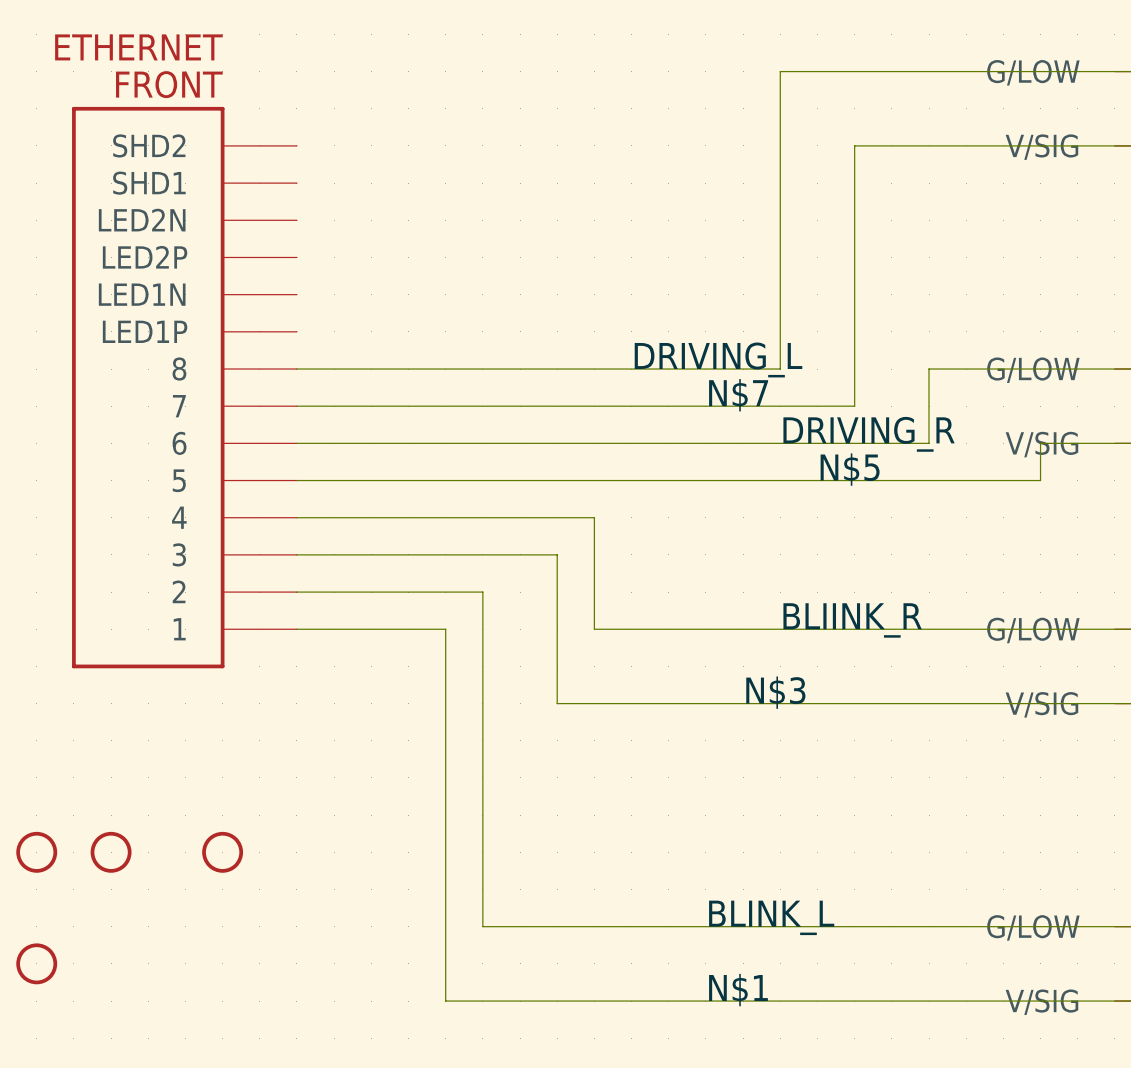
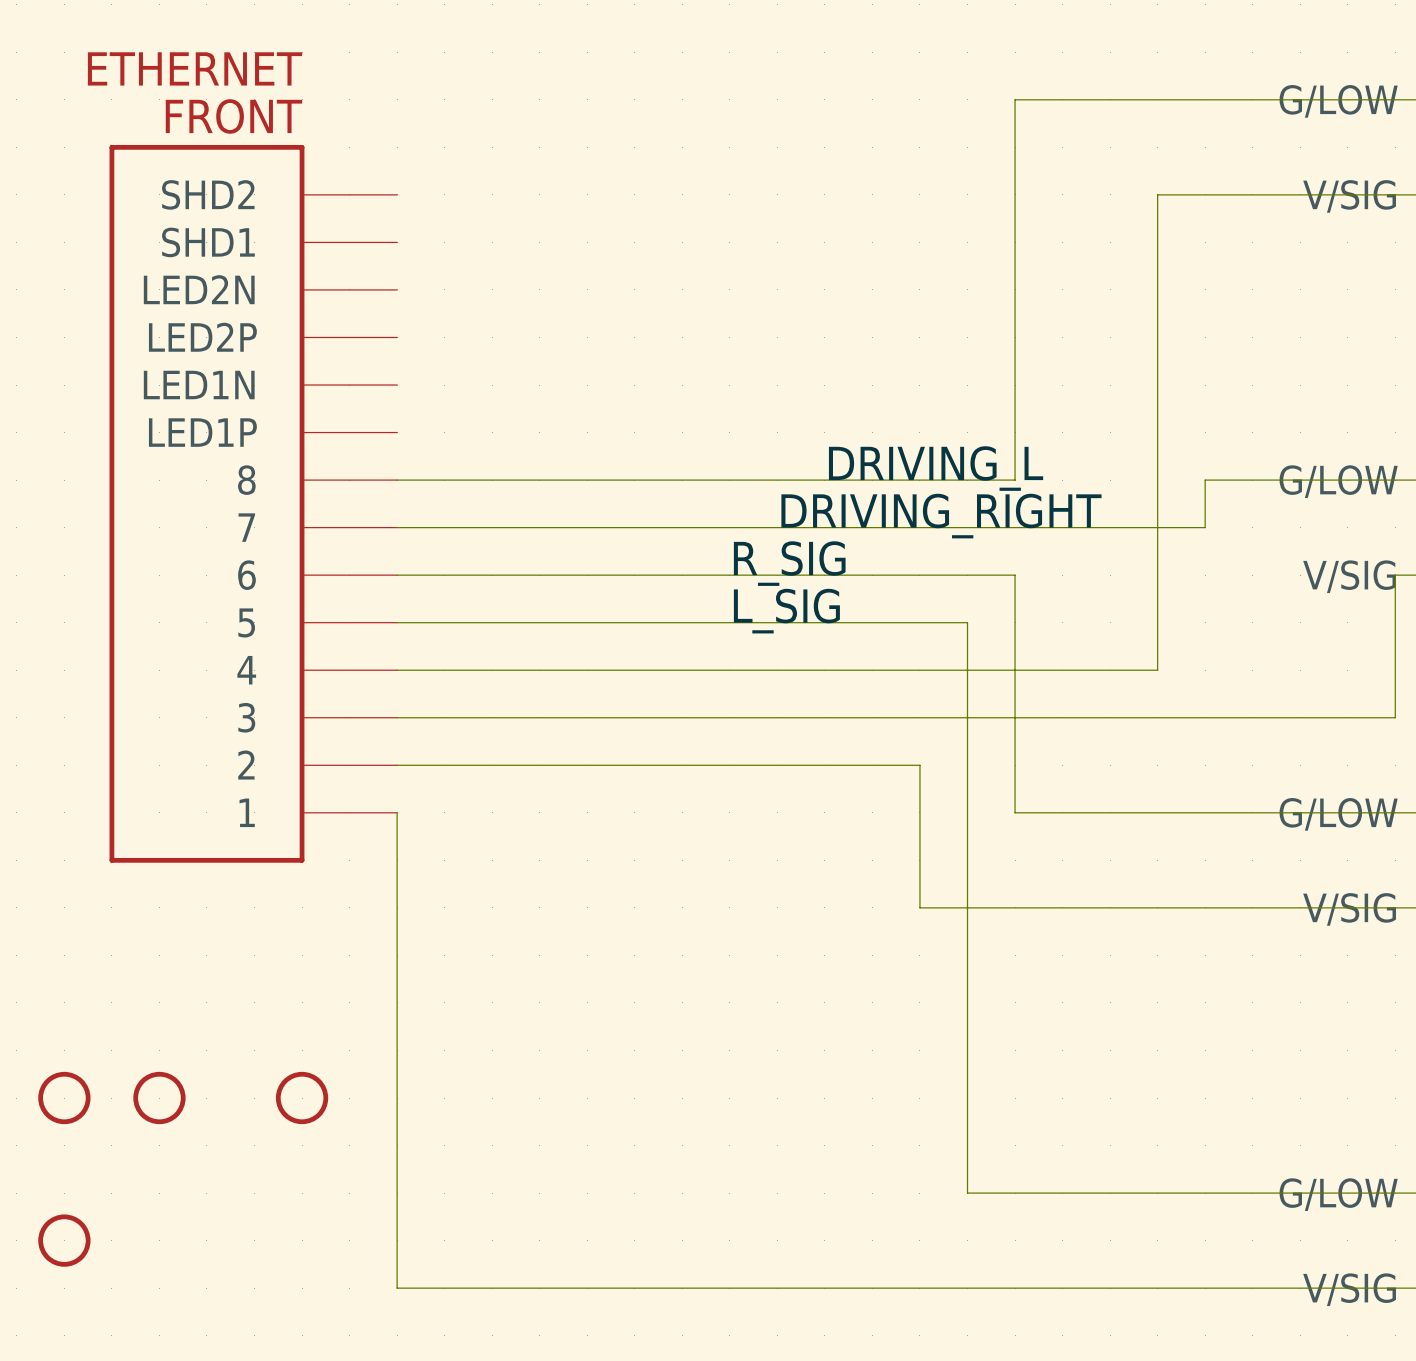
wire: (891, 145) (854, 145) (854, 406) -> (1157, 194) (1157, 670) (777, 670)
label: N$7 (738, 395) -> none
wire: (929, 406) (929, 443) (780, 443) -> (1205, 527) (1110, 527)
label: none -> R_SIG (789, 563)
label: DRIVING_R (869, 434) -> DRIVING_RIGHT (941, 516)
wire: (1077, 443) (1040, 443) (1040, 480) (743, 480) -> (1395, 575) (1395, 717) (729, 717)
label: N$5 (850, 469) -> none
label: none -> L_SIG (786, 611)
wire: (594, 517) (594, 629) (780, 629) -> (1015, 575) (1015, 812)
wire: (557, 554) (557, 703) (705, 703) -> (634, 765) (919, 765) (919, 907)
wire: (482, 592) (482, 926) (743, 926) -> (967, 622) (967, 1193)
label: BLIINK_R (852, 620) -> none
wire: (296, 629) (445, 629) (445, 1001) -> (397, 812) (397, 1288) (587, 1288)
label: N$3 (775, 692) -> none
label: BLINK_L (771, 917) -> none
label: N$1 (738, 990) -> none

